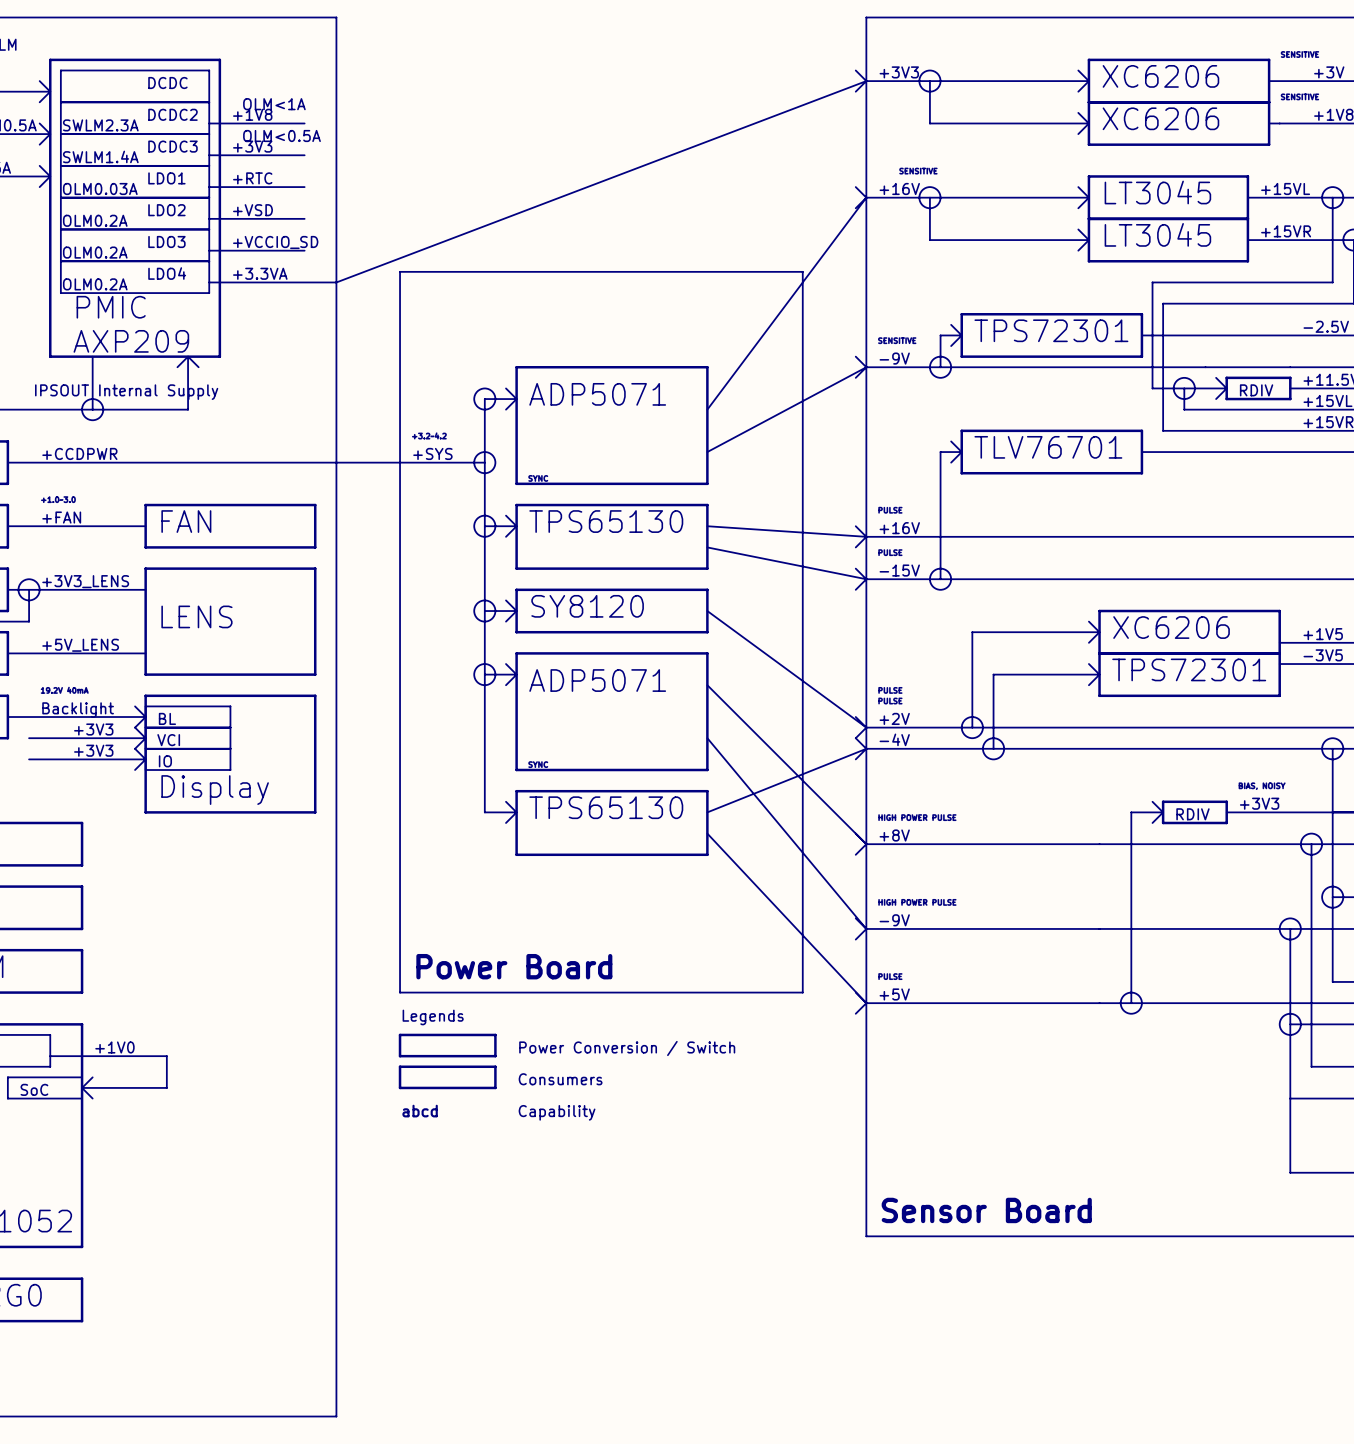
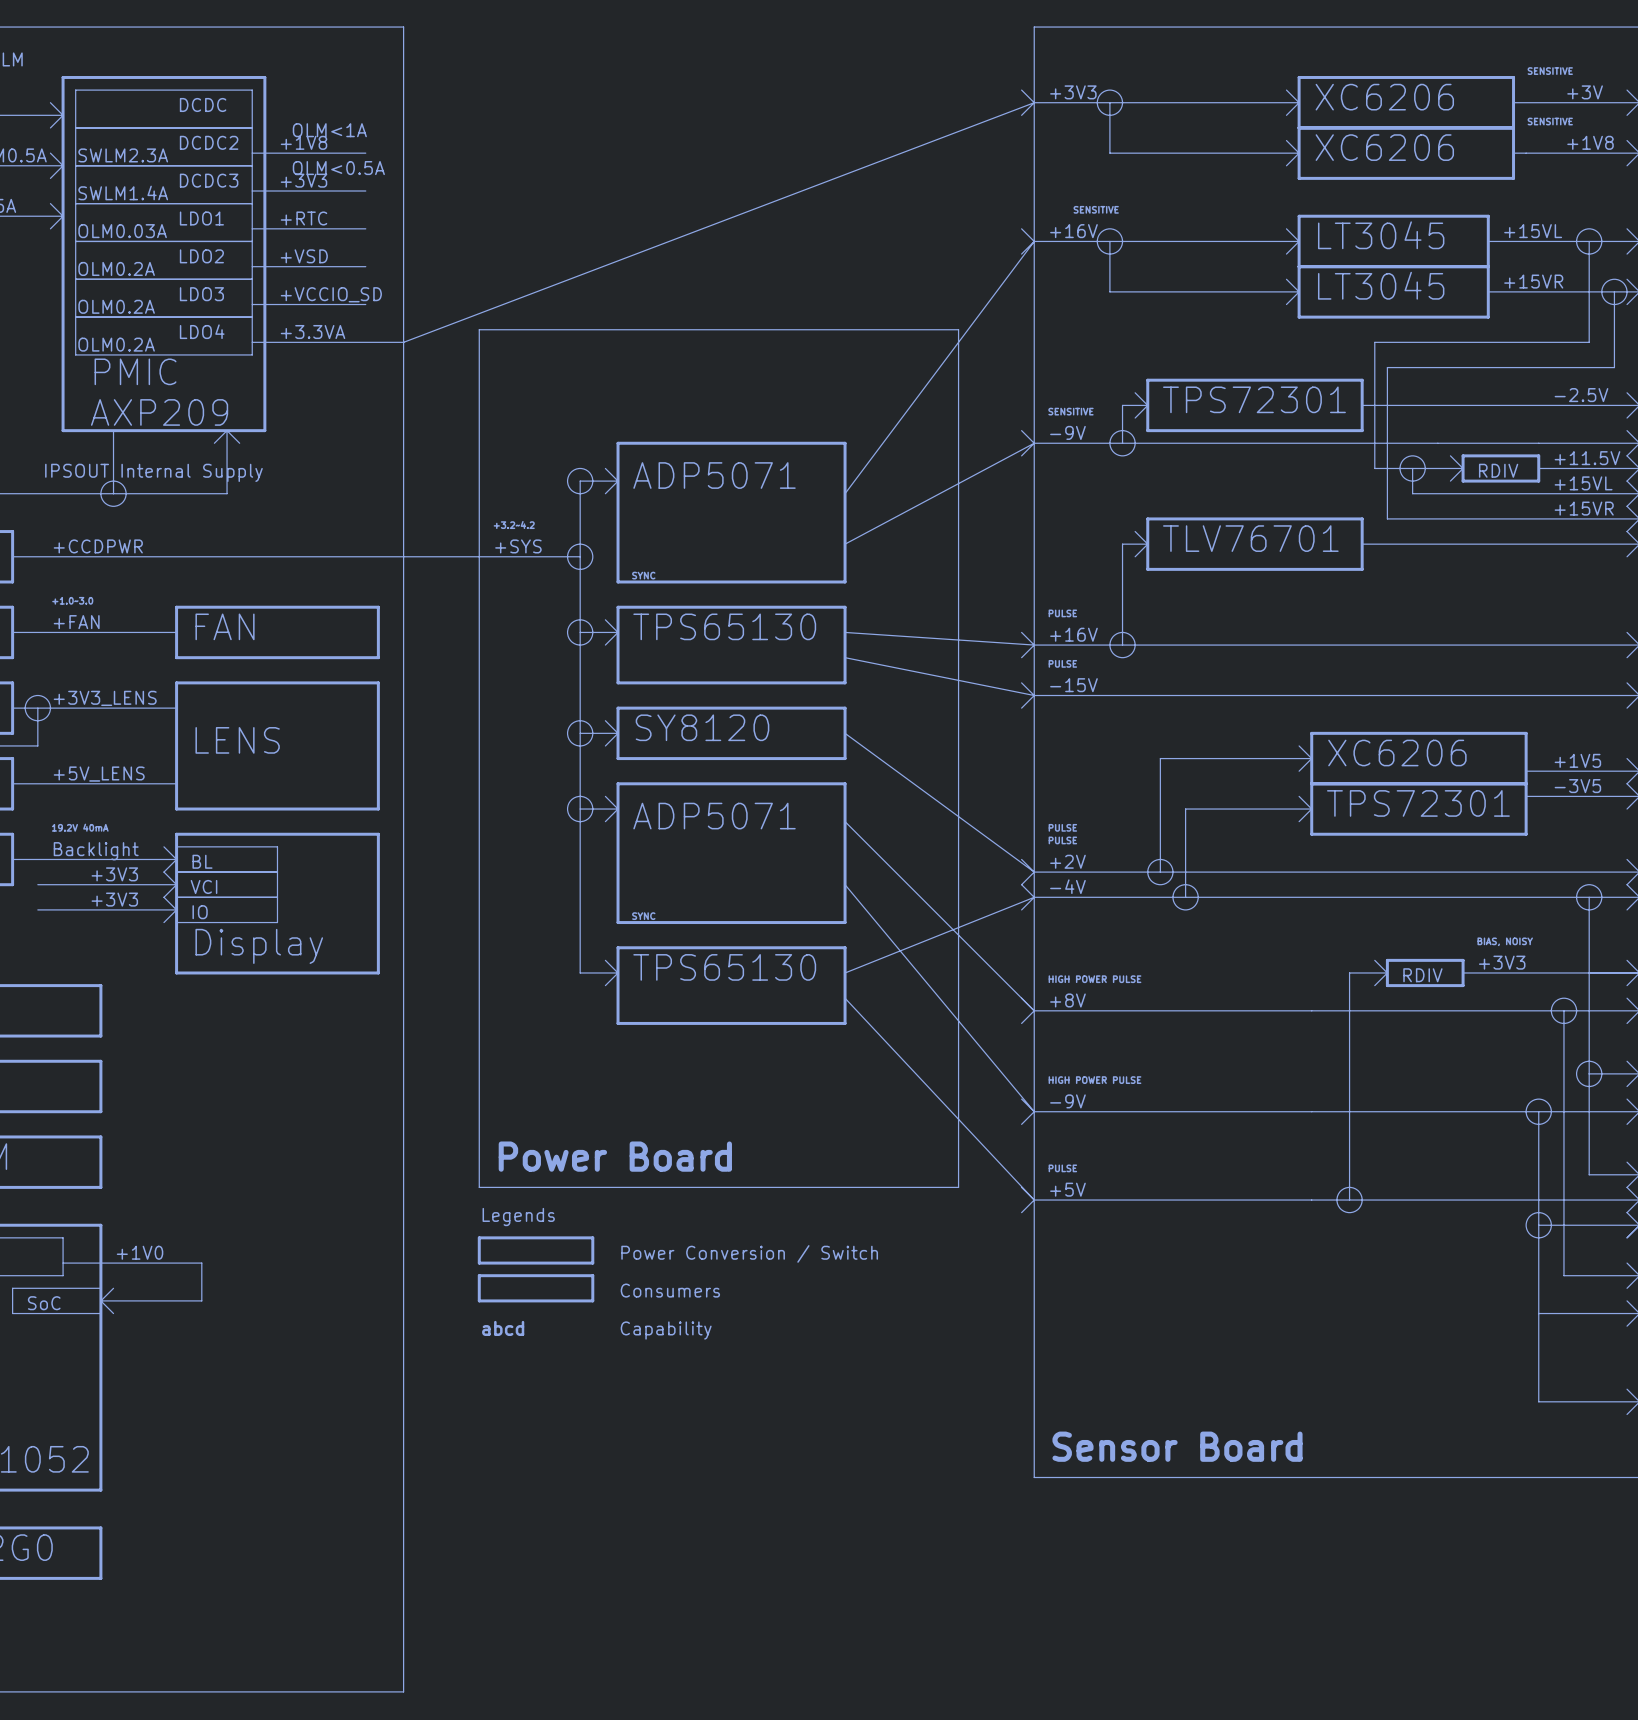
line: (940, 536) (940, 579) -> none
drawing position: (940, 579) -> (1122, 645)

